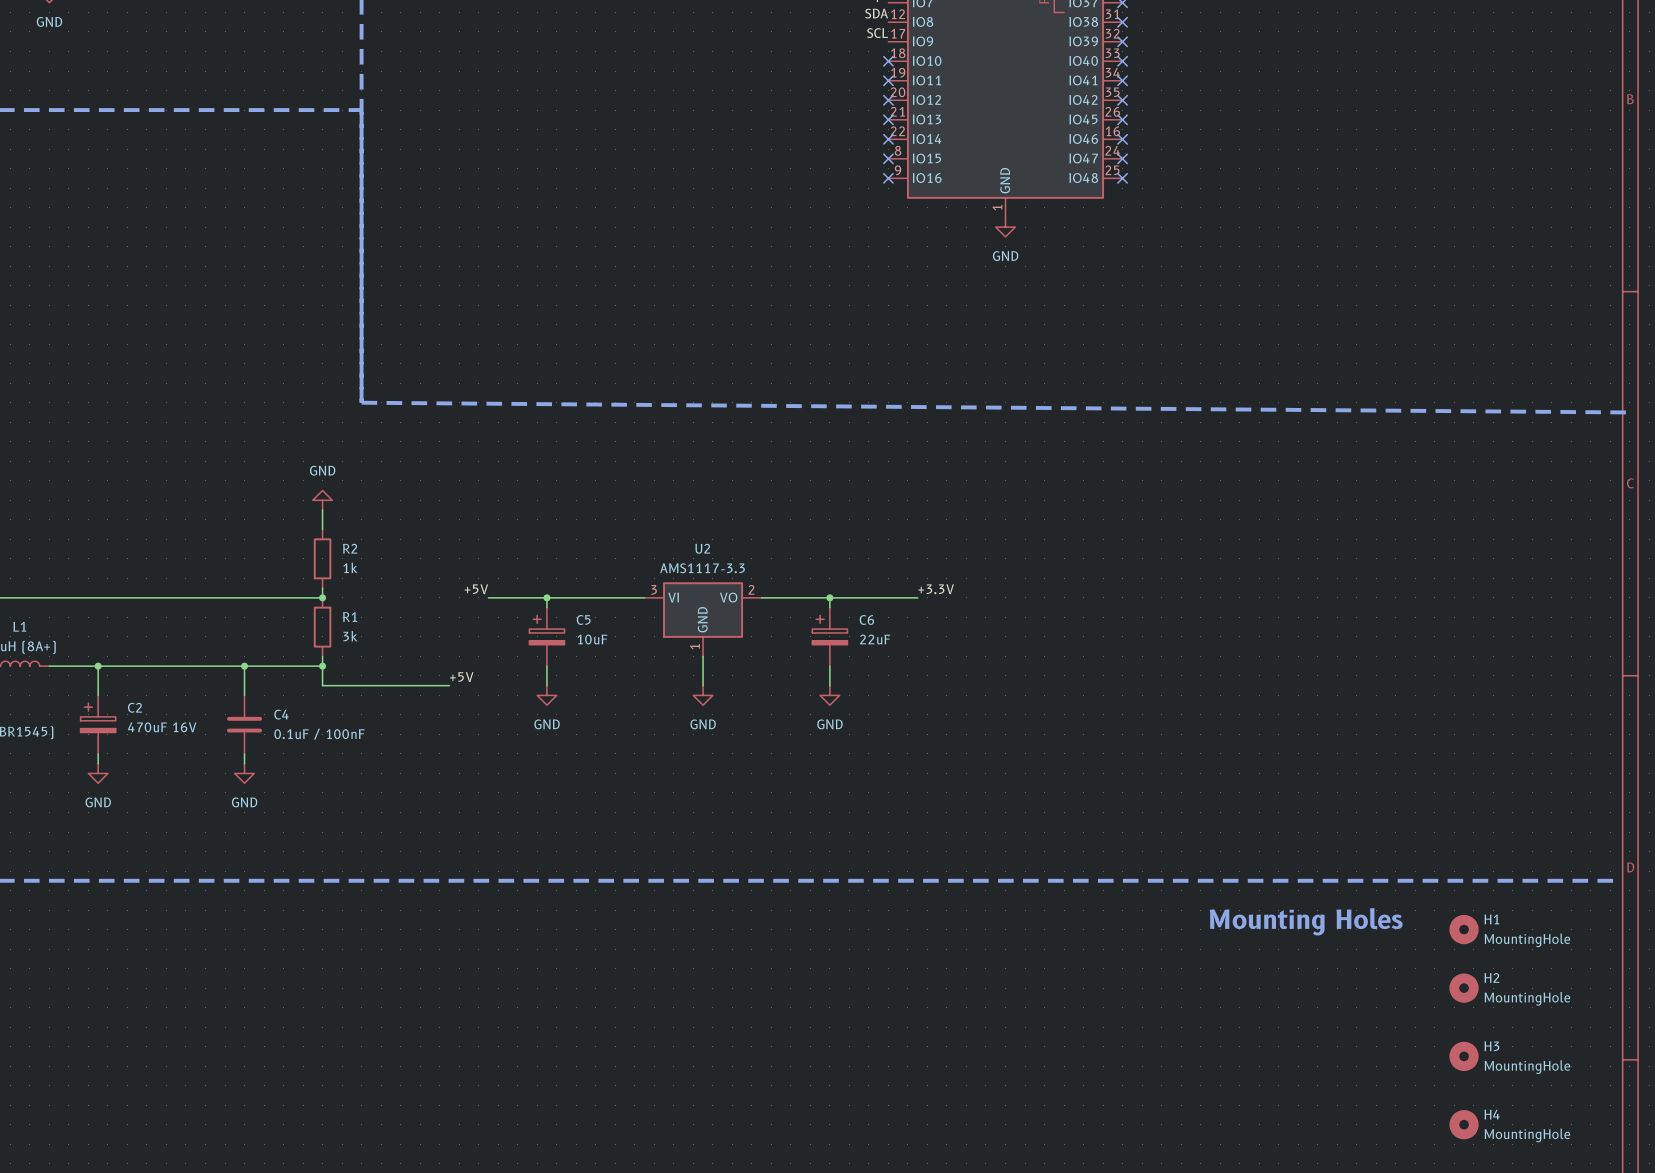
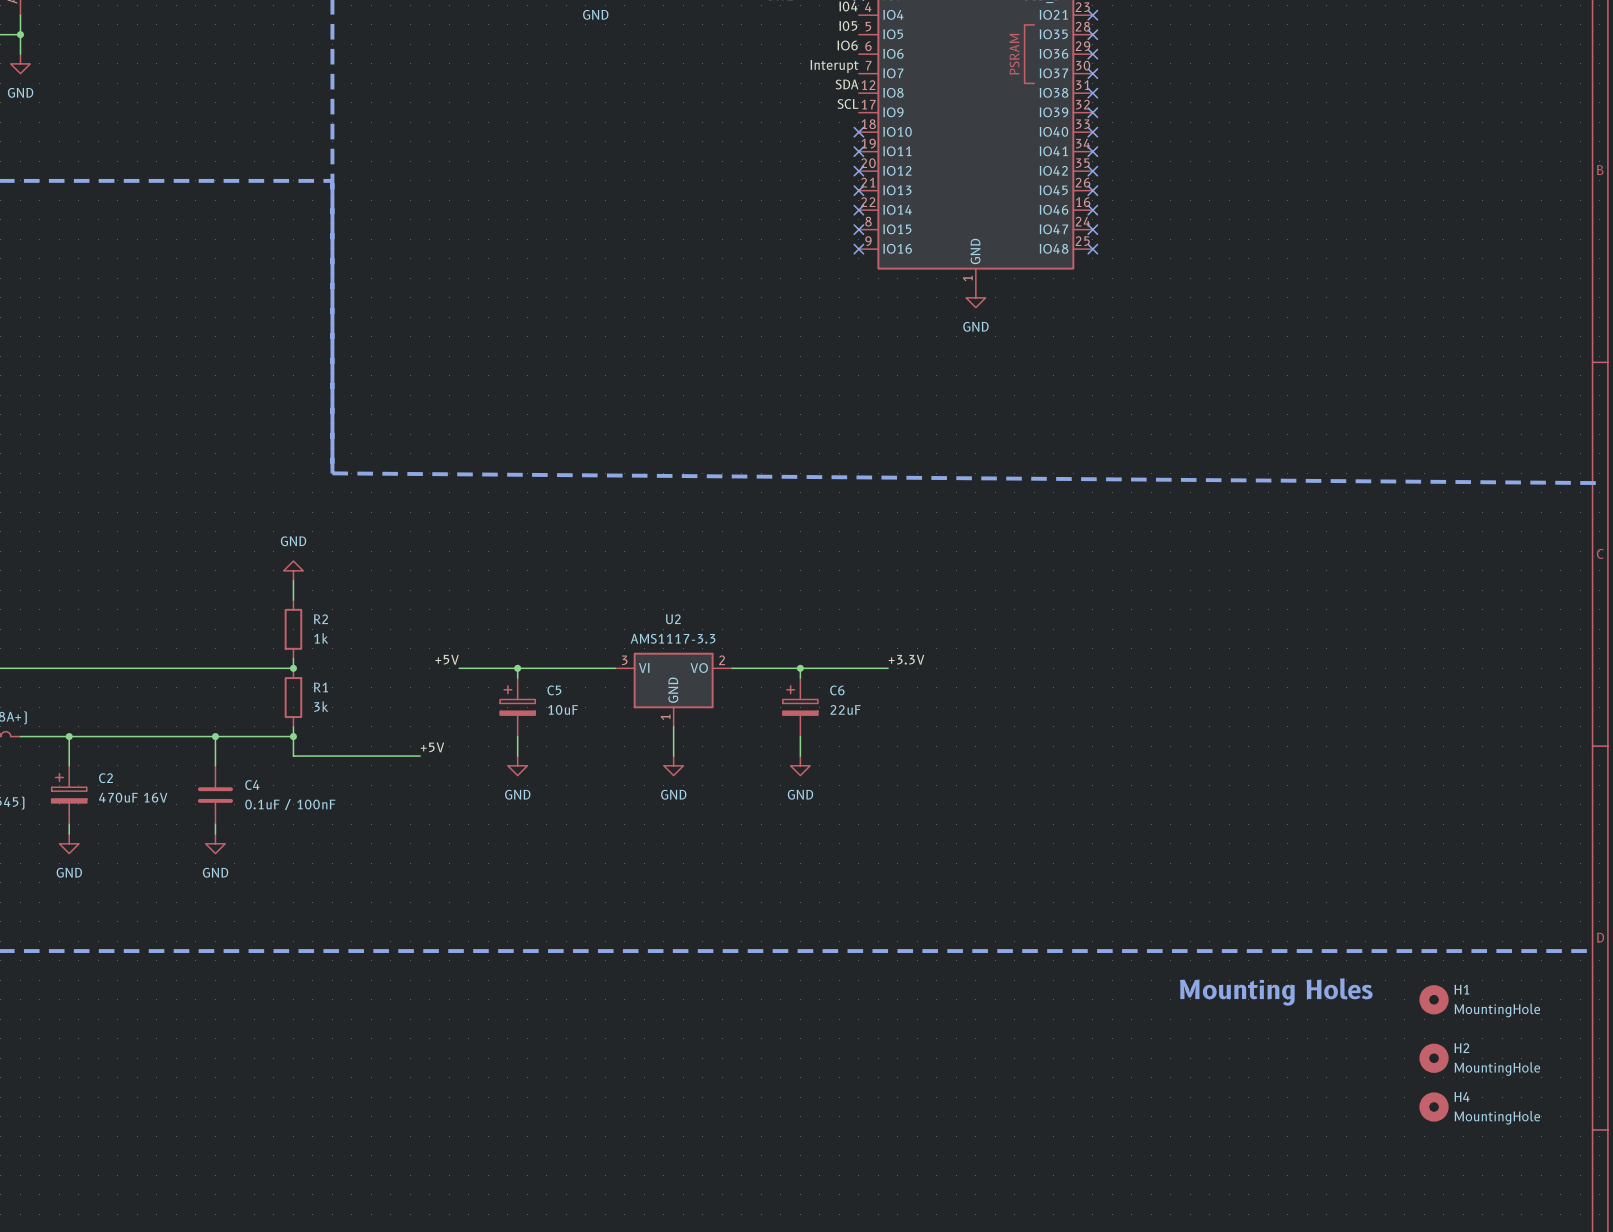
H3: MountingHole (1464, 1056) -> none
H4 position: (1464, 1124) -> (1434, 1107)

